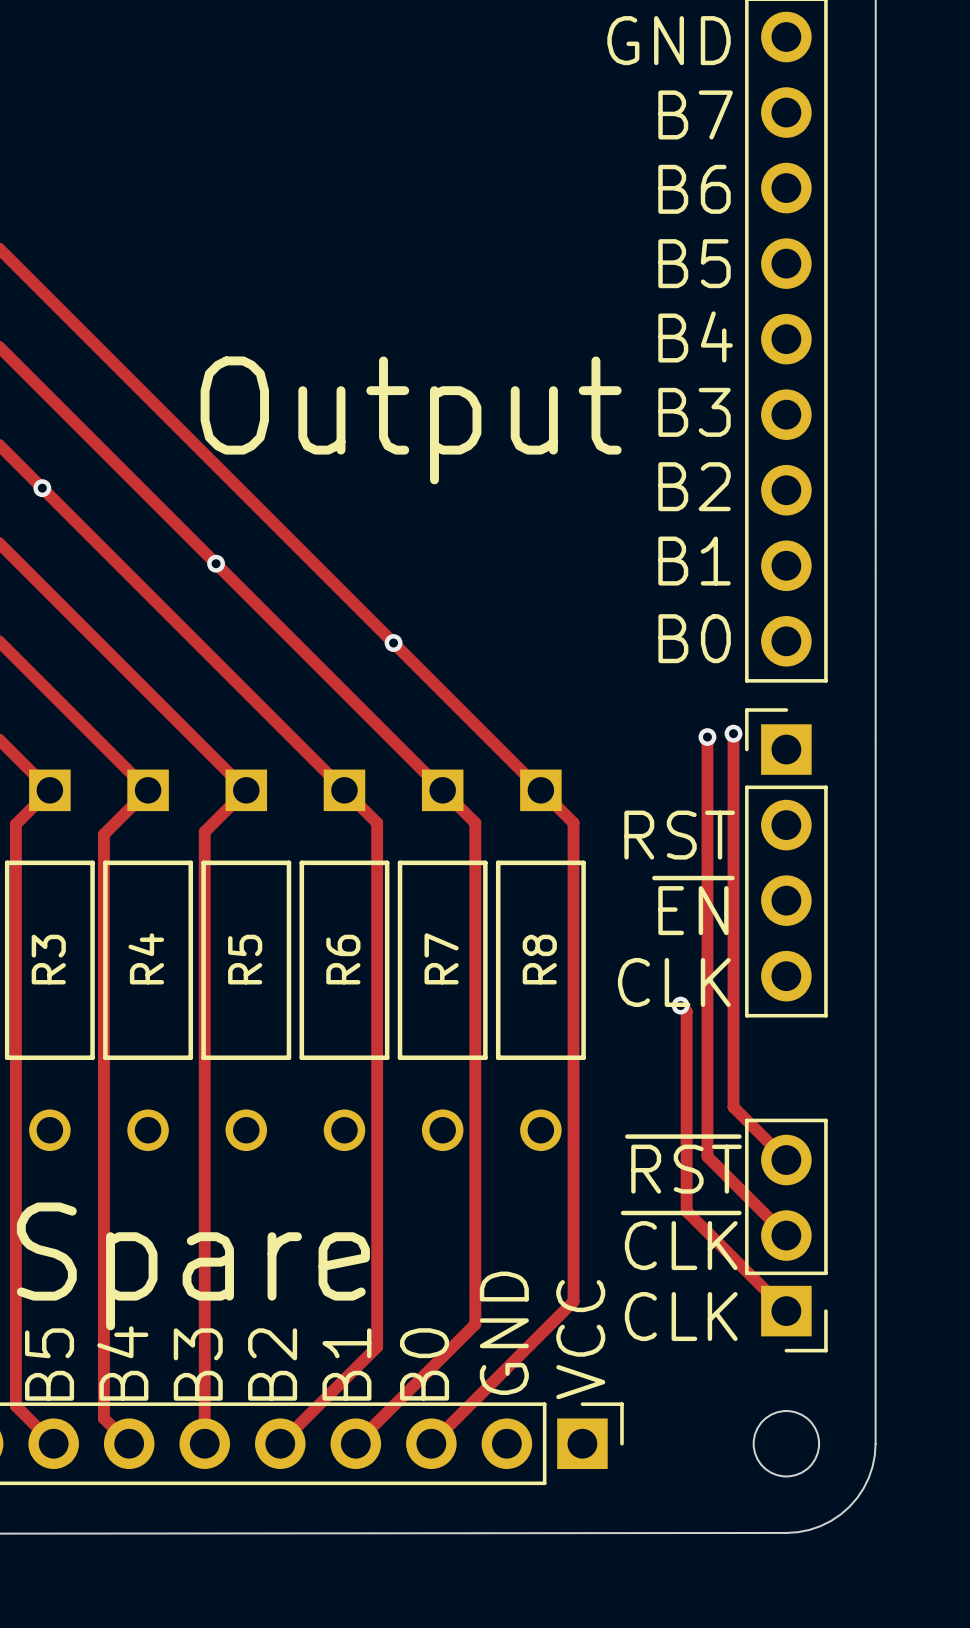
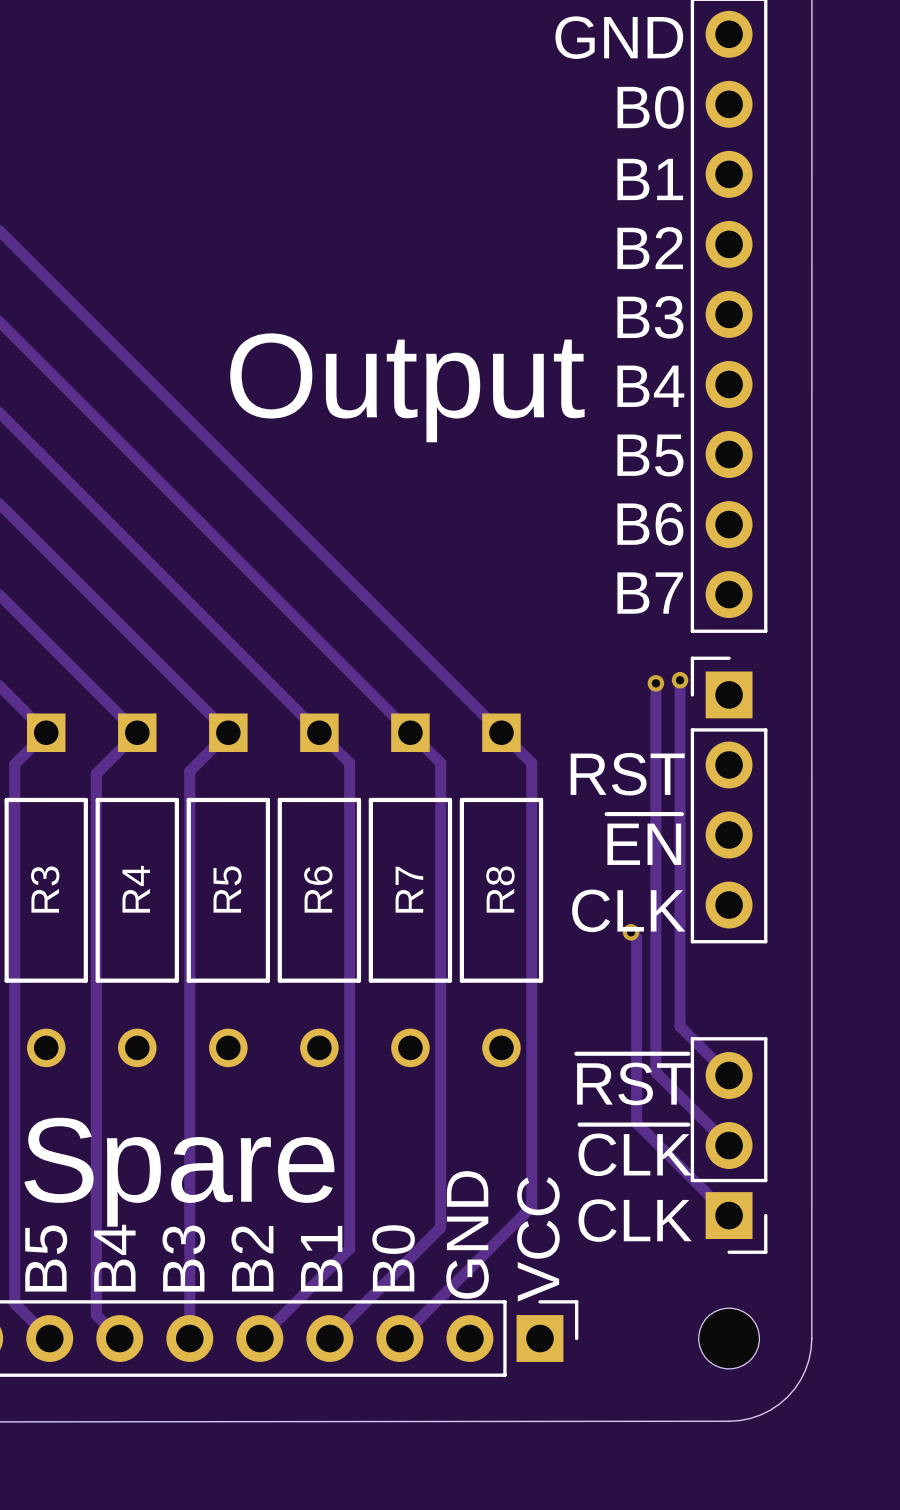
text: B7 (695, 114) -> B0 (650, 107)
text: B6 (694, 189) -> B1 (650, 179)
text: B5 (694, 263) -> B2 (650, 248)
text: B4 (695, 336) -> B3 (650, 317)
text: B3 (694, 412) -> B4 (650, 386)
text: B2 (694, 486) -> B5 (650, 455)
via: (42, 488) -> none
text: B1 (694, 561) -> B6 (650, 524)
via: (216, 563) -> none
text: B0 (694, 638) -> B7 (650, 593)
via: (393, 643) -> none

